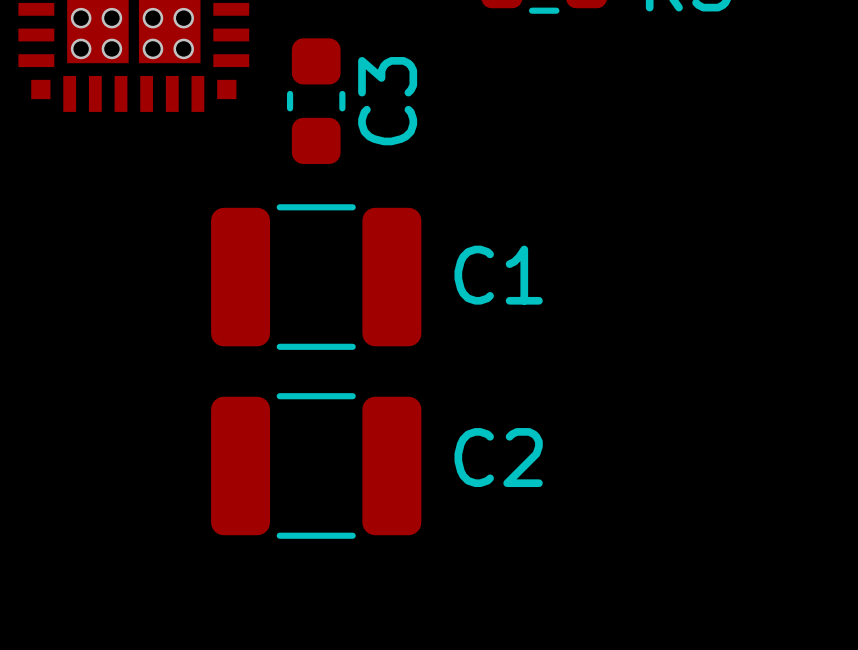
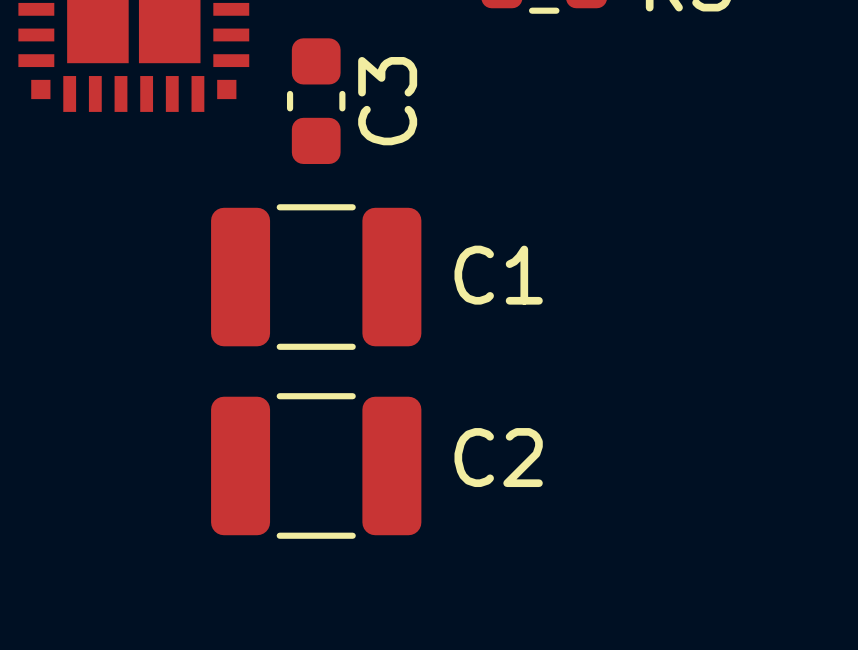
via: (81, 18) -> none
via: (111, 18) -> none
via: (152, 18) -> none
via: (183, 18) -> none
via: (81, 48) -> none
via: (111, 48) -> none
via: (152, 48) -> none
via: (183, 48) -> none

